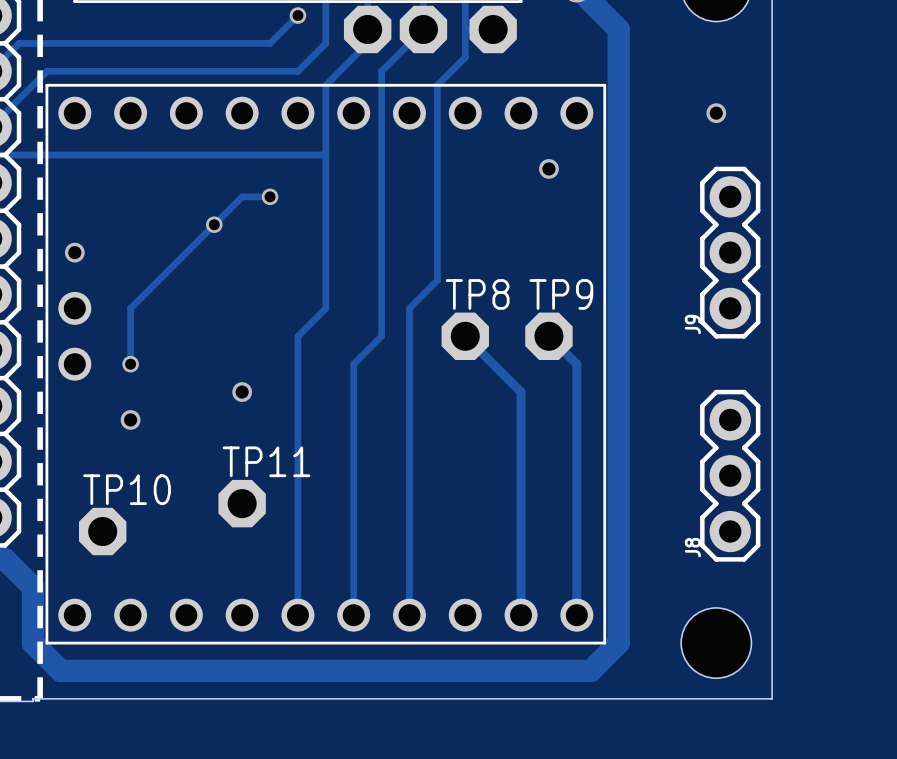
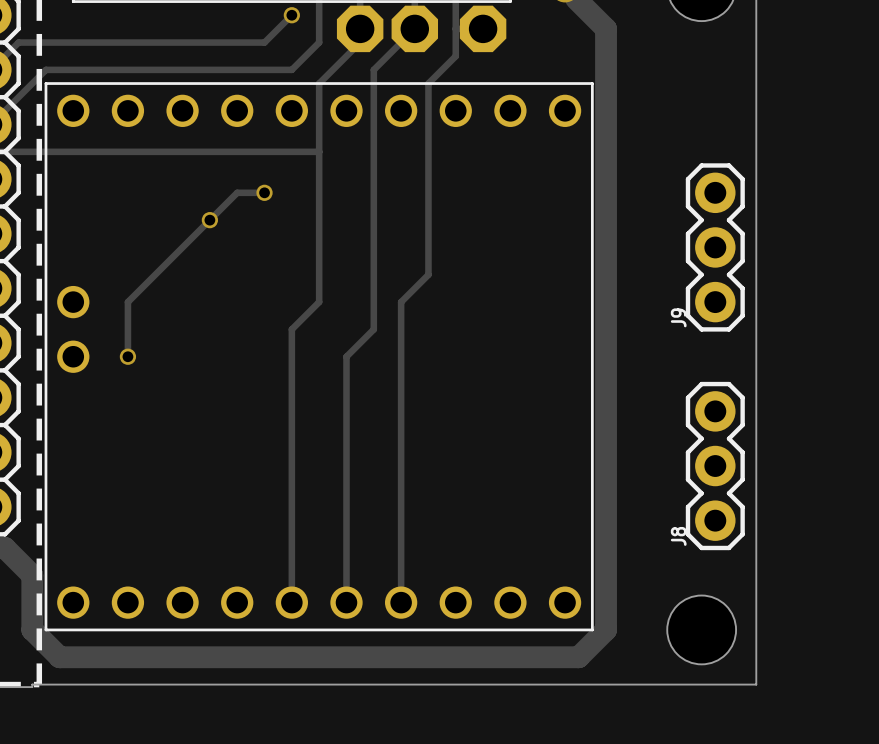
via: (716, 113) -> none
via: (548, 168) -> none
via: (74, 252) -> none
track: (465, 336) (521, 392) (521, 615) -> none
TP8: (465, 336) -> none
track: (548, 336) (576, 364) (576, 615) -> none
TP9: (548, 336) -> none
via: (242, 392) -> none
via: (130, 419) -> none
TP11: (242, 503) -> none
TP10: (102, 531) -> none

